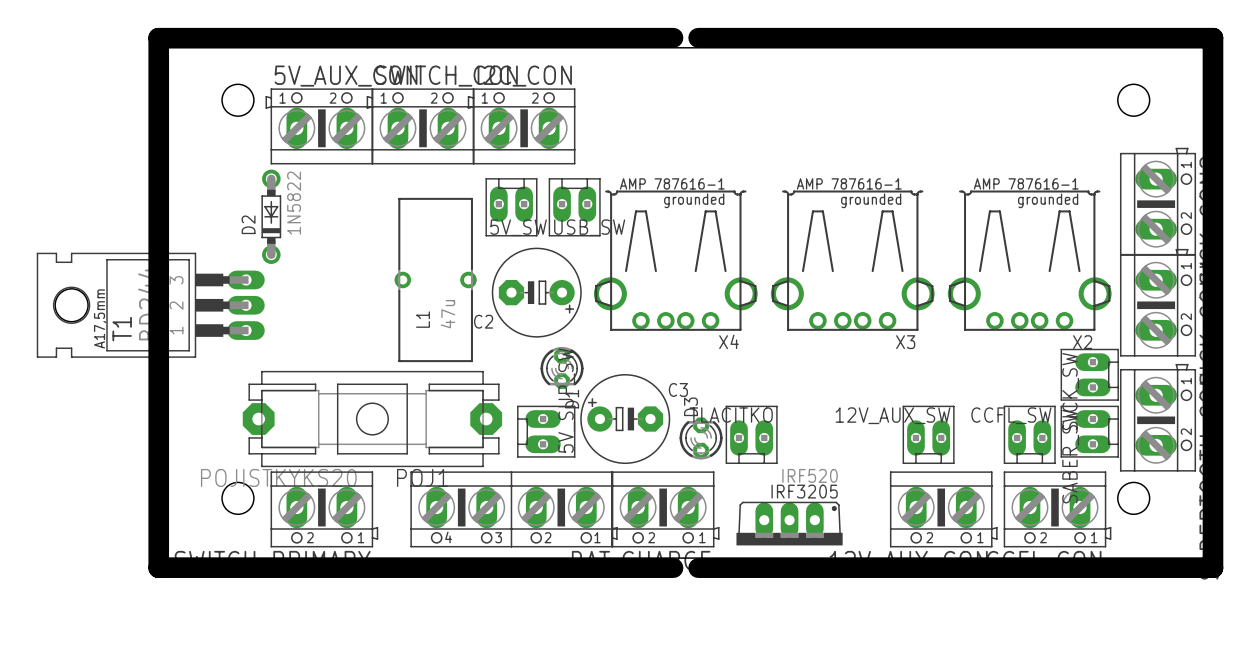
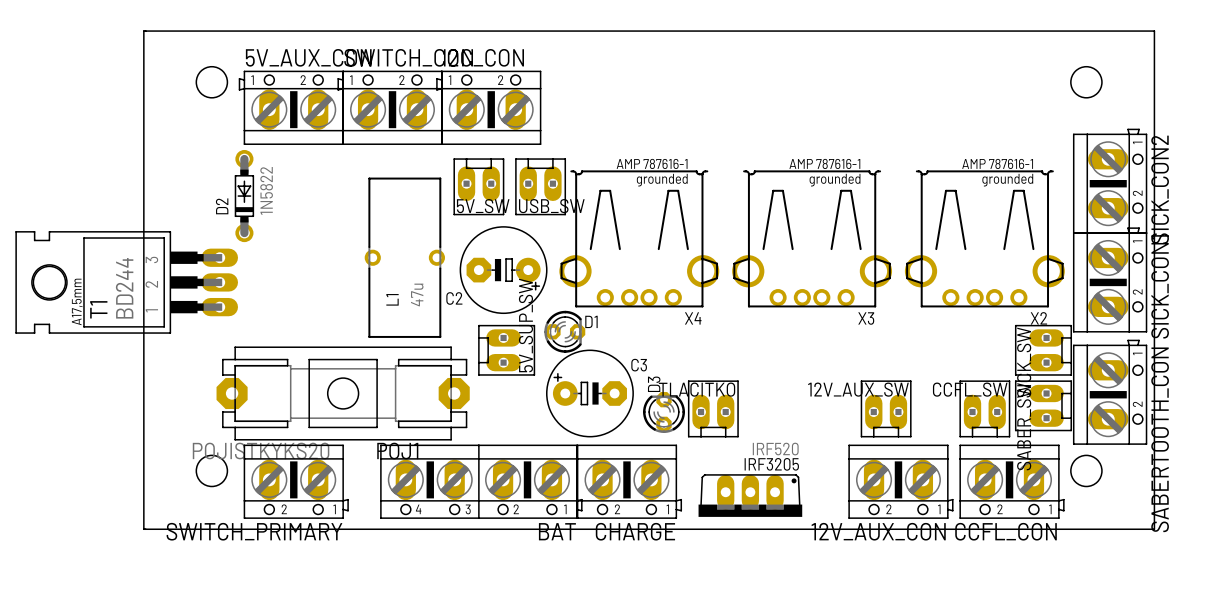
board edge: (673, 37) (158, 37) (158, 568) (673, 568) -> none
board edge: (698, 37) (1213, 37) (1213, 568) (698, 568) -> none
D1 rotation: 0° (562, 367) -> 90° counterclockwise (564, 331)
D1 position: (562, 367) -> (564, 331)
5V_SUP_SW position: (546, 431) -> (506, 350)

